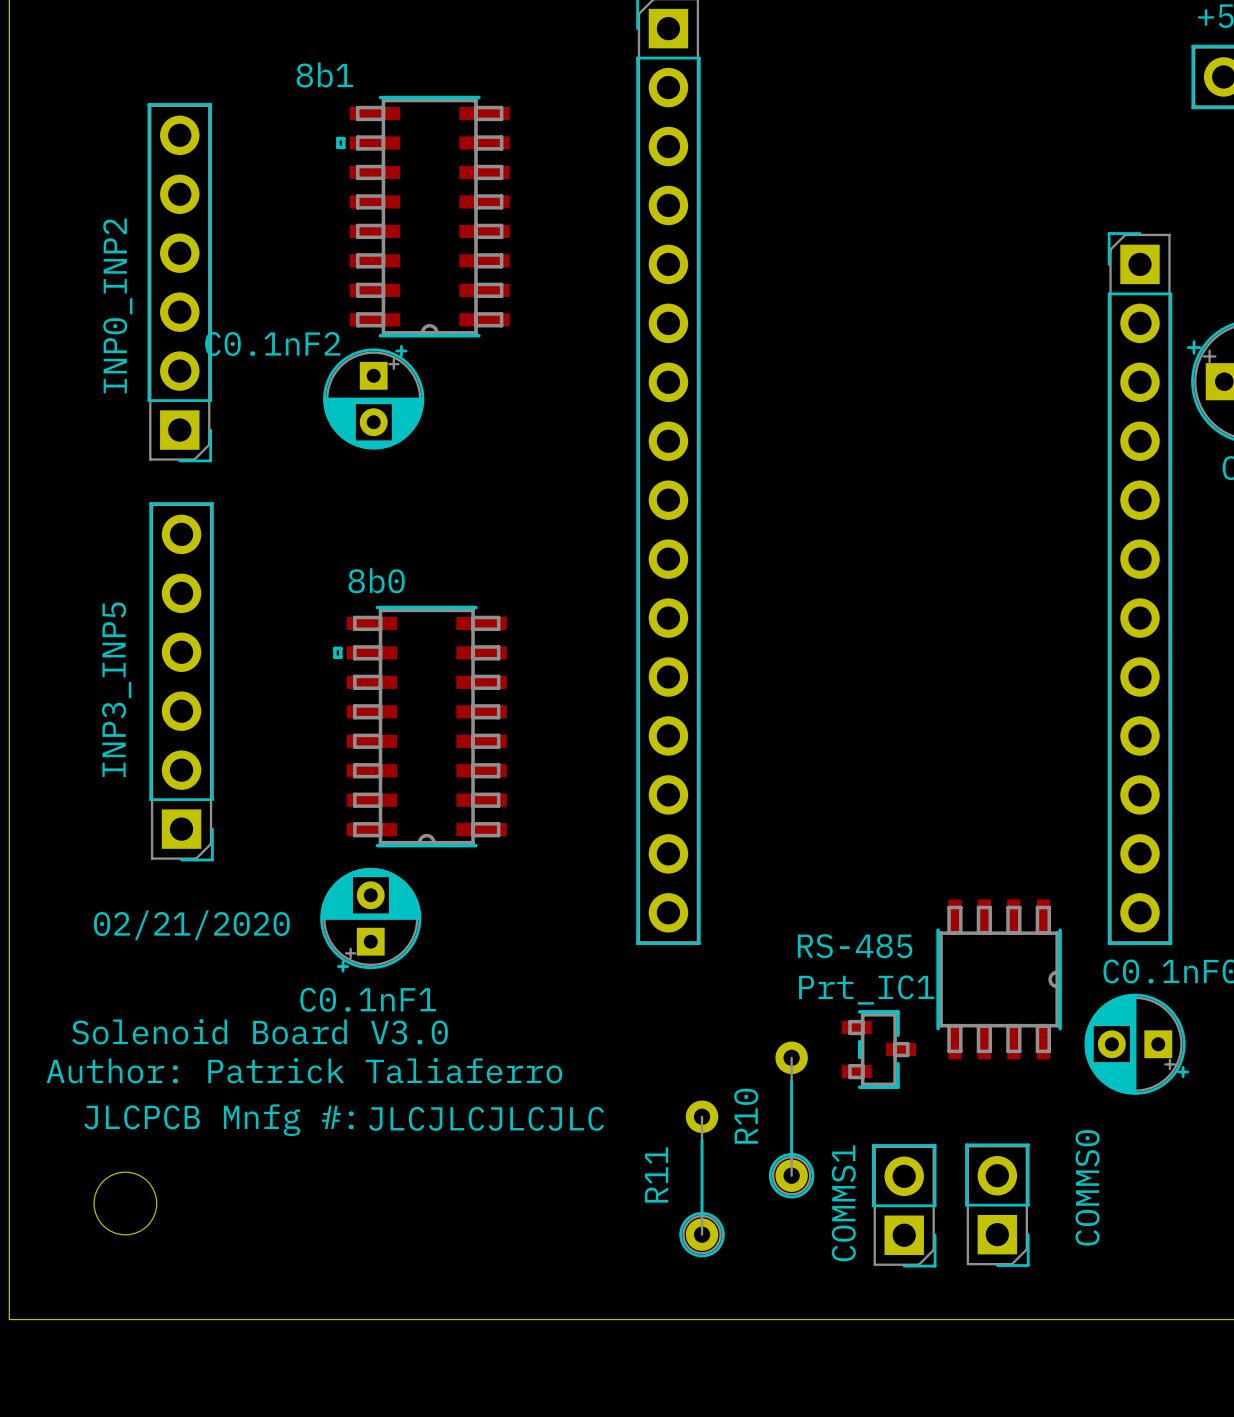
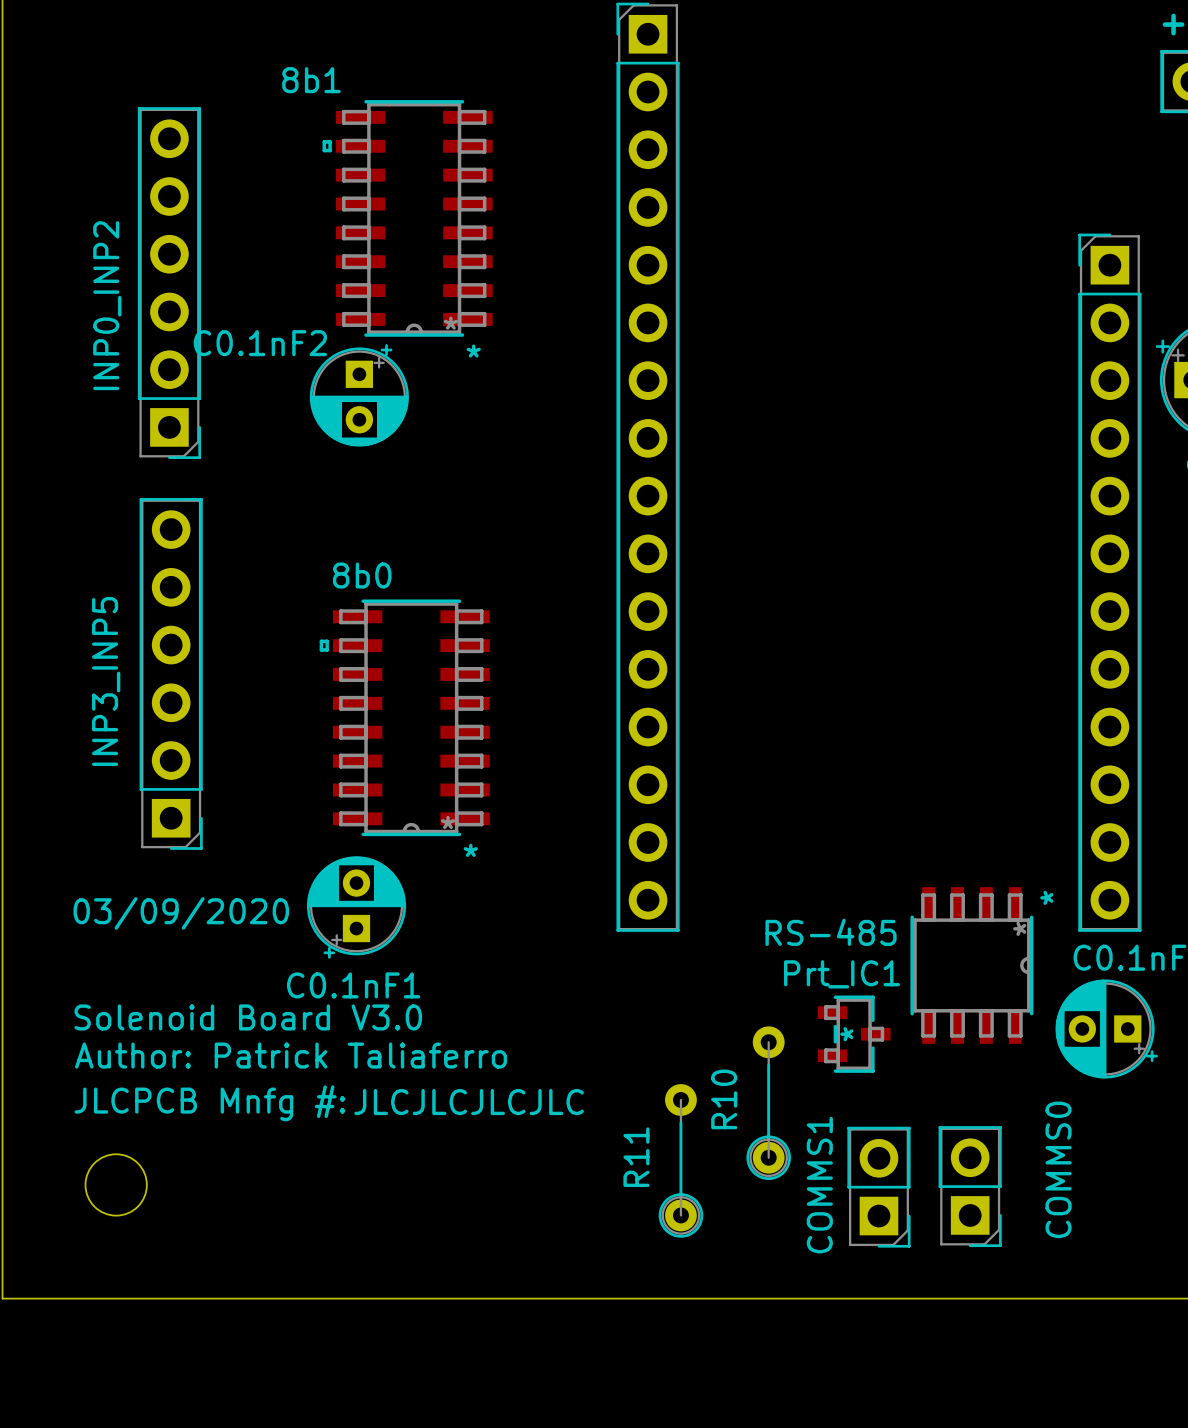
8b1 text: none -> * (450, 323)
8b1 text: none -> * (473, 351)
8b0 text: none -> * (448, 822)
8b0 text: none -> * (470, 850)
RS-485 text: none -> * (1046, 897)
text: 02/21/2020 (191, 925) -> 03/09/2020 (181, 913)
RS-485 text: none -> * (1019, 928)
Prt_IC1 text: none -> * (846, 1034)

